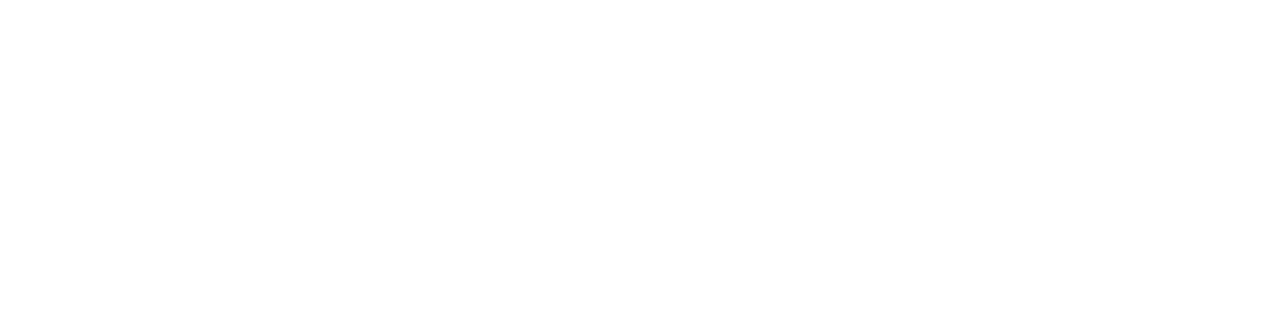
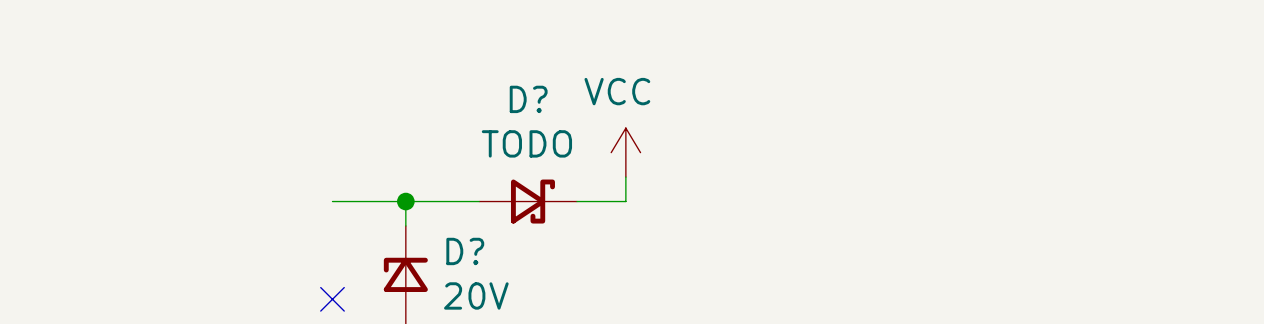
power symbol: none -> VCC (625, 152)
wire: none -> (625, 177) (625, 201) (576, 201)
wire: none -> (332, 201) (479, 201)
wire: none -> (405, 201) (405, 225)
junction: none -> (405, 201)
D?: none -> TODO (528, 201)
D?: none -> 20V (405, 274)
no-connect mark: none -> (332, 299)

